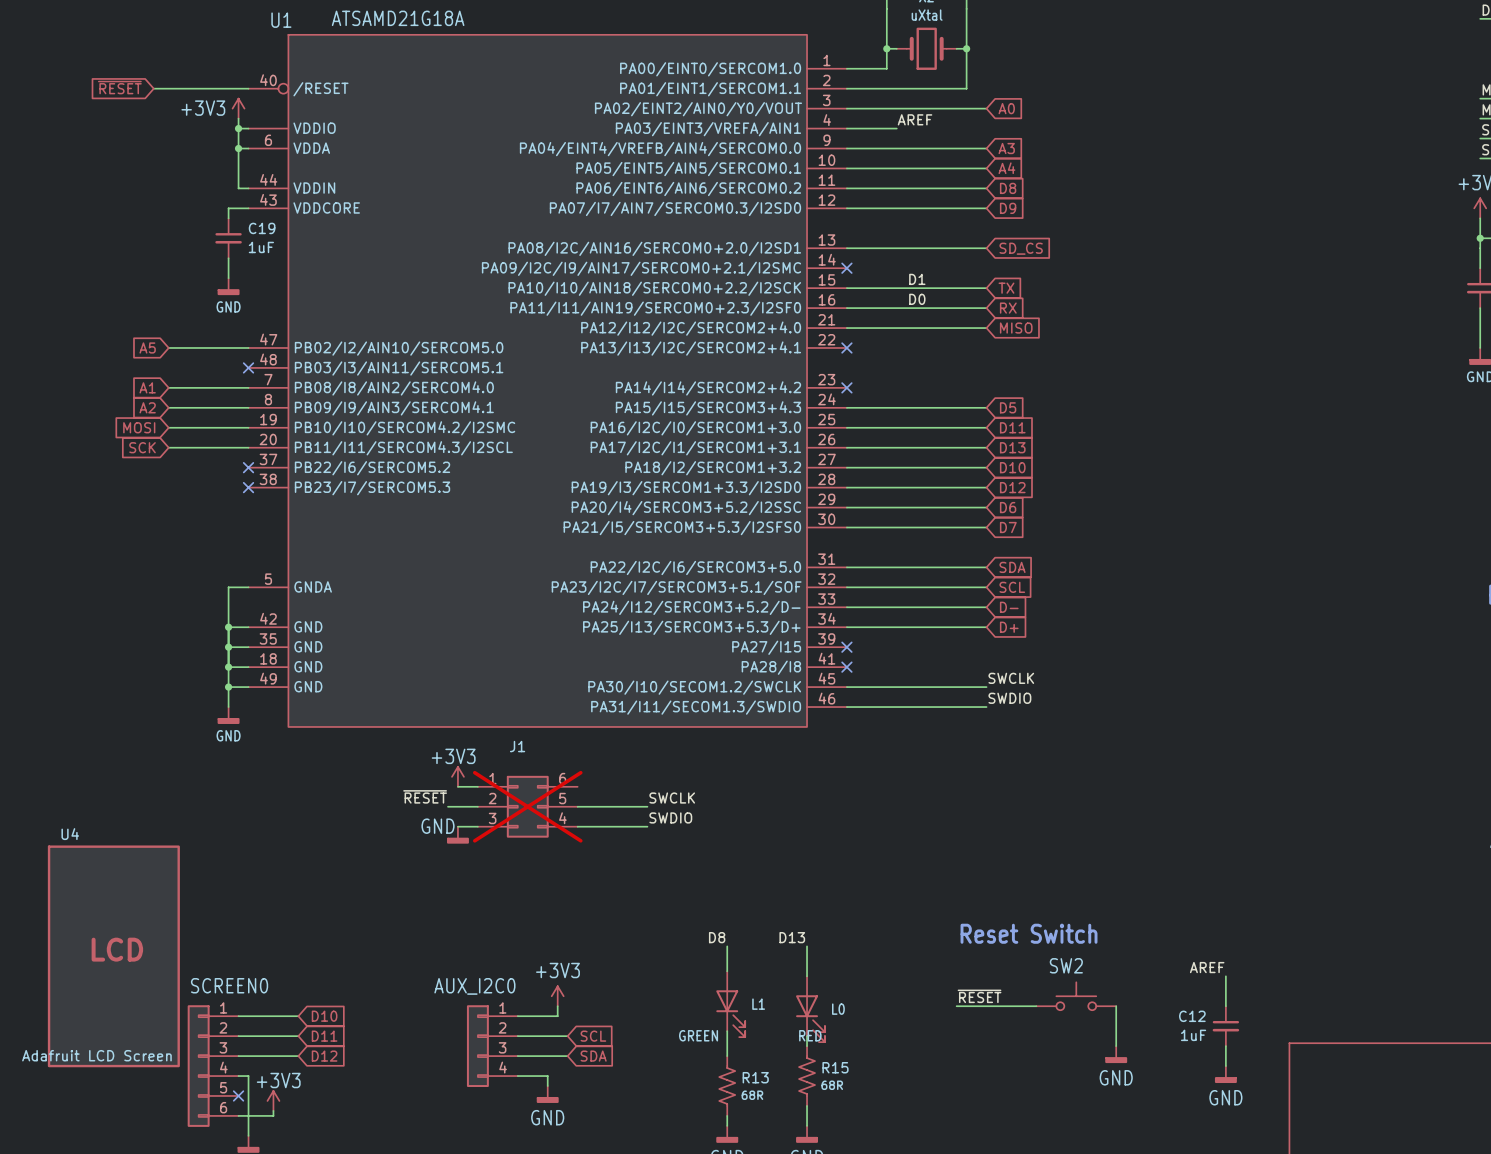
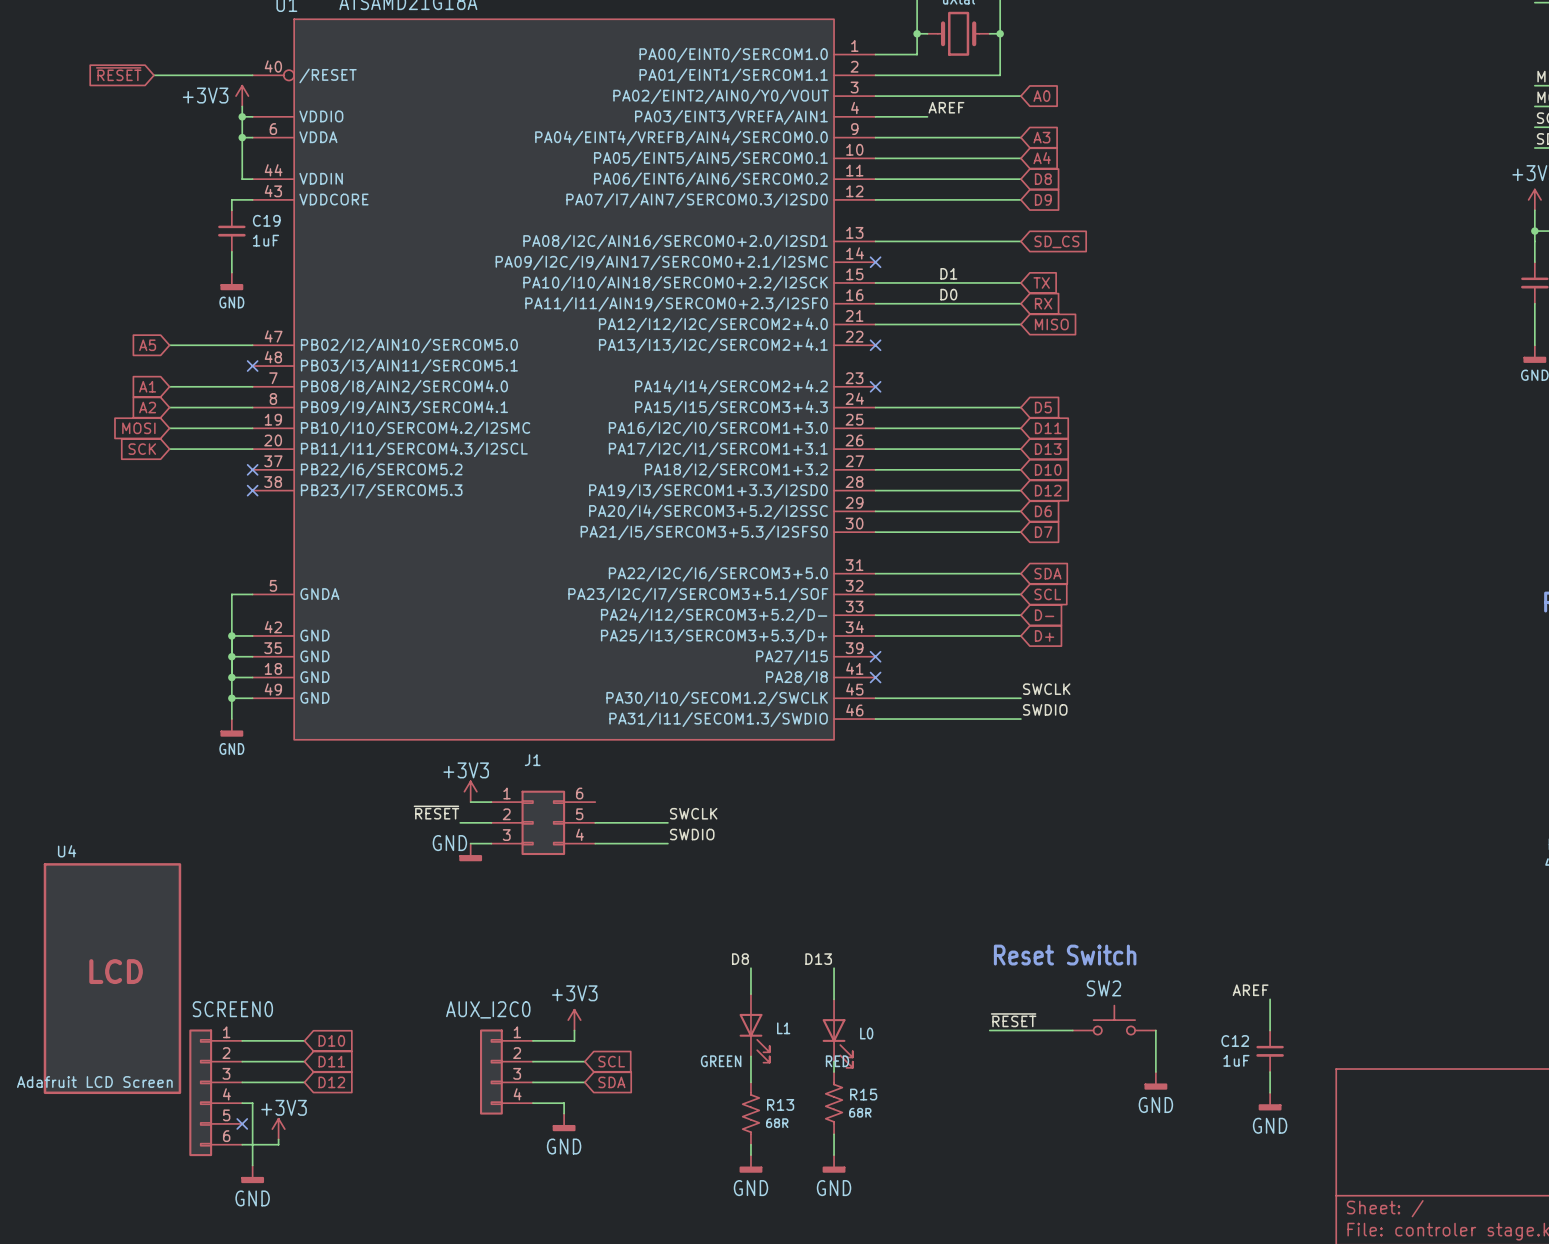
J1 do-not-place cross: (527, 806) -> none

